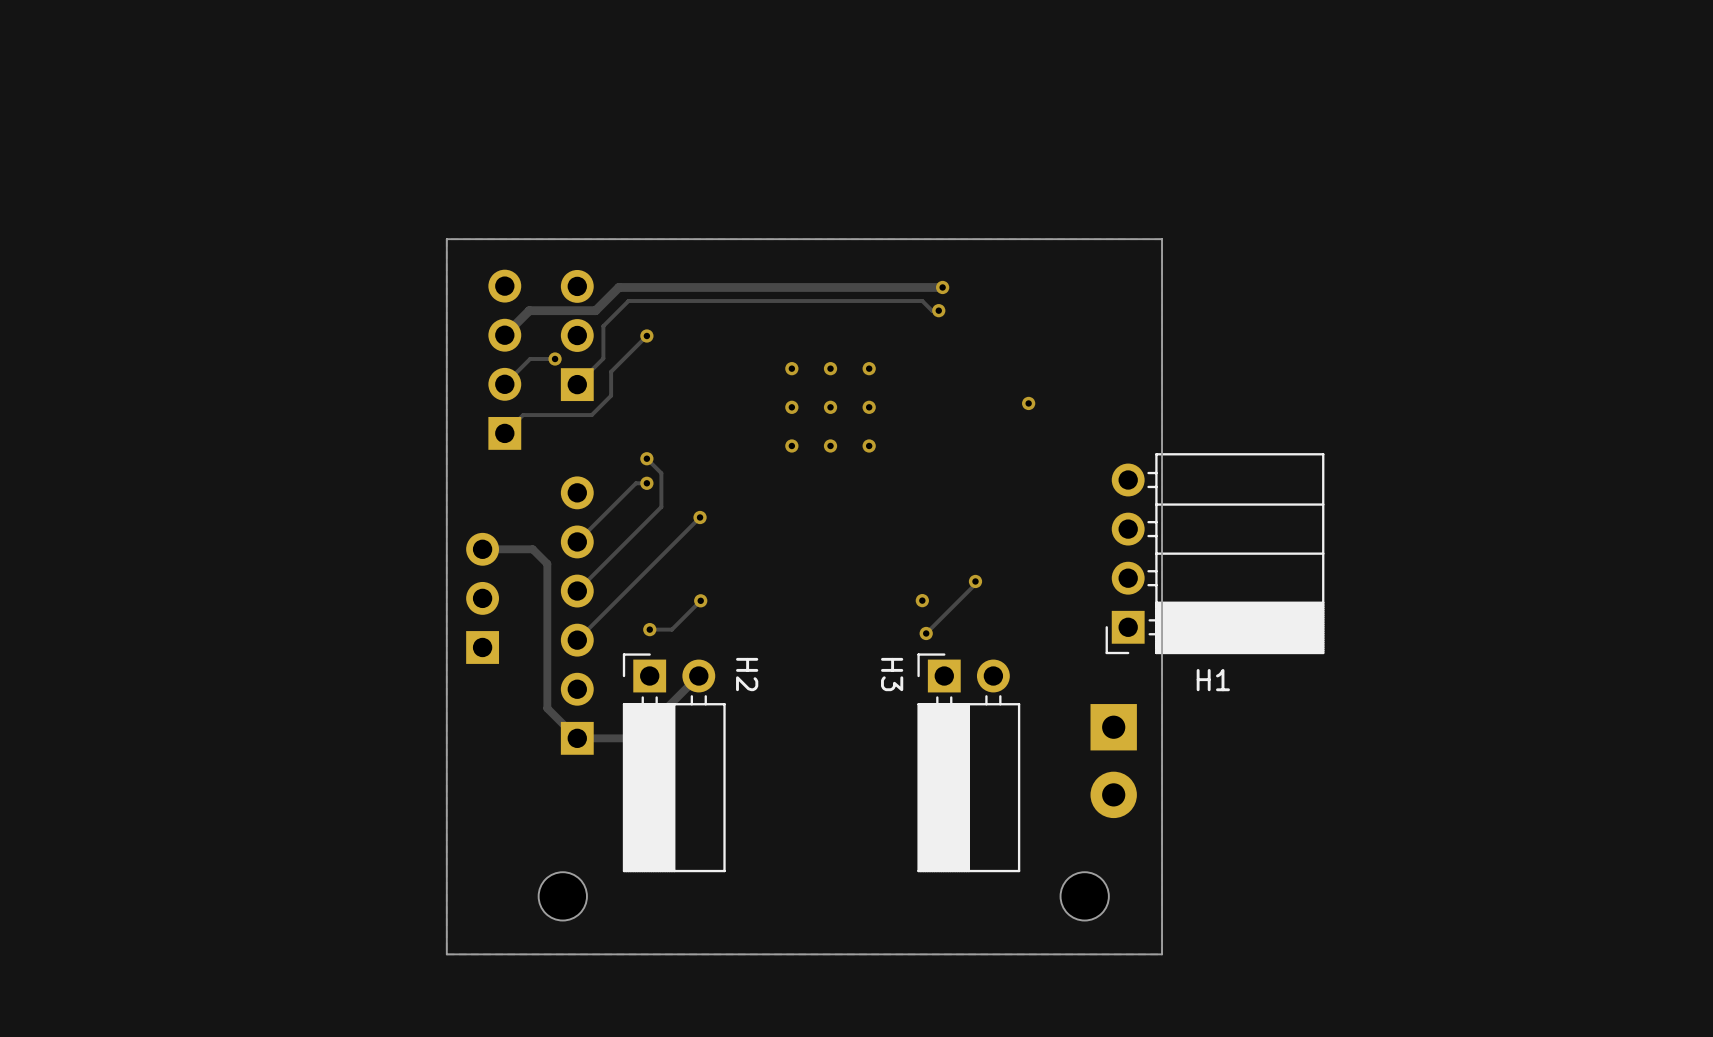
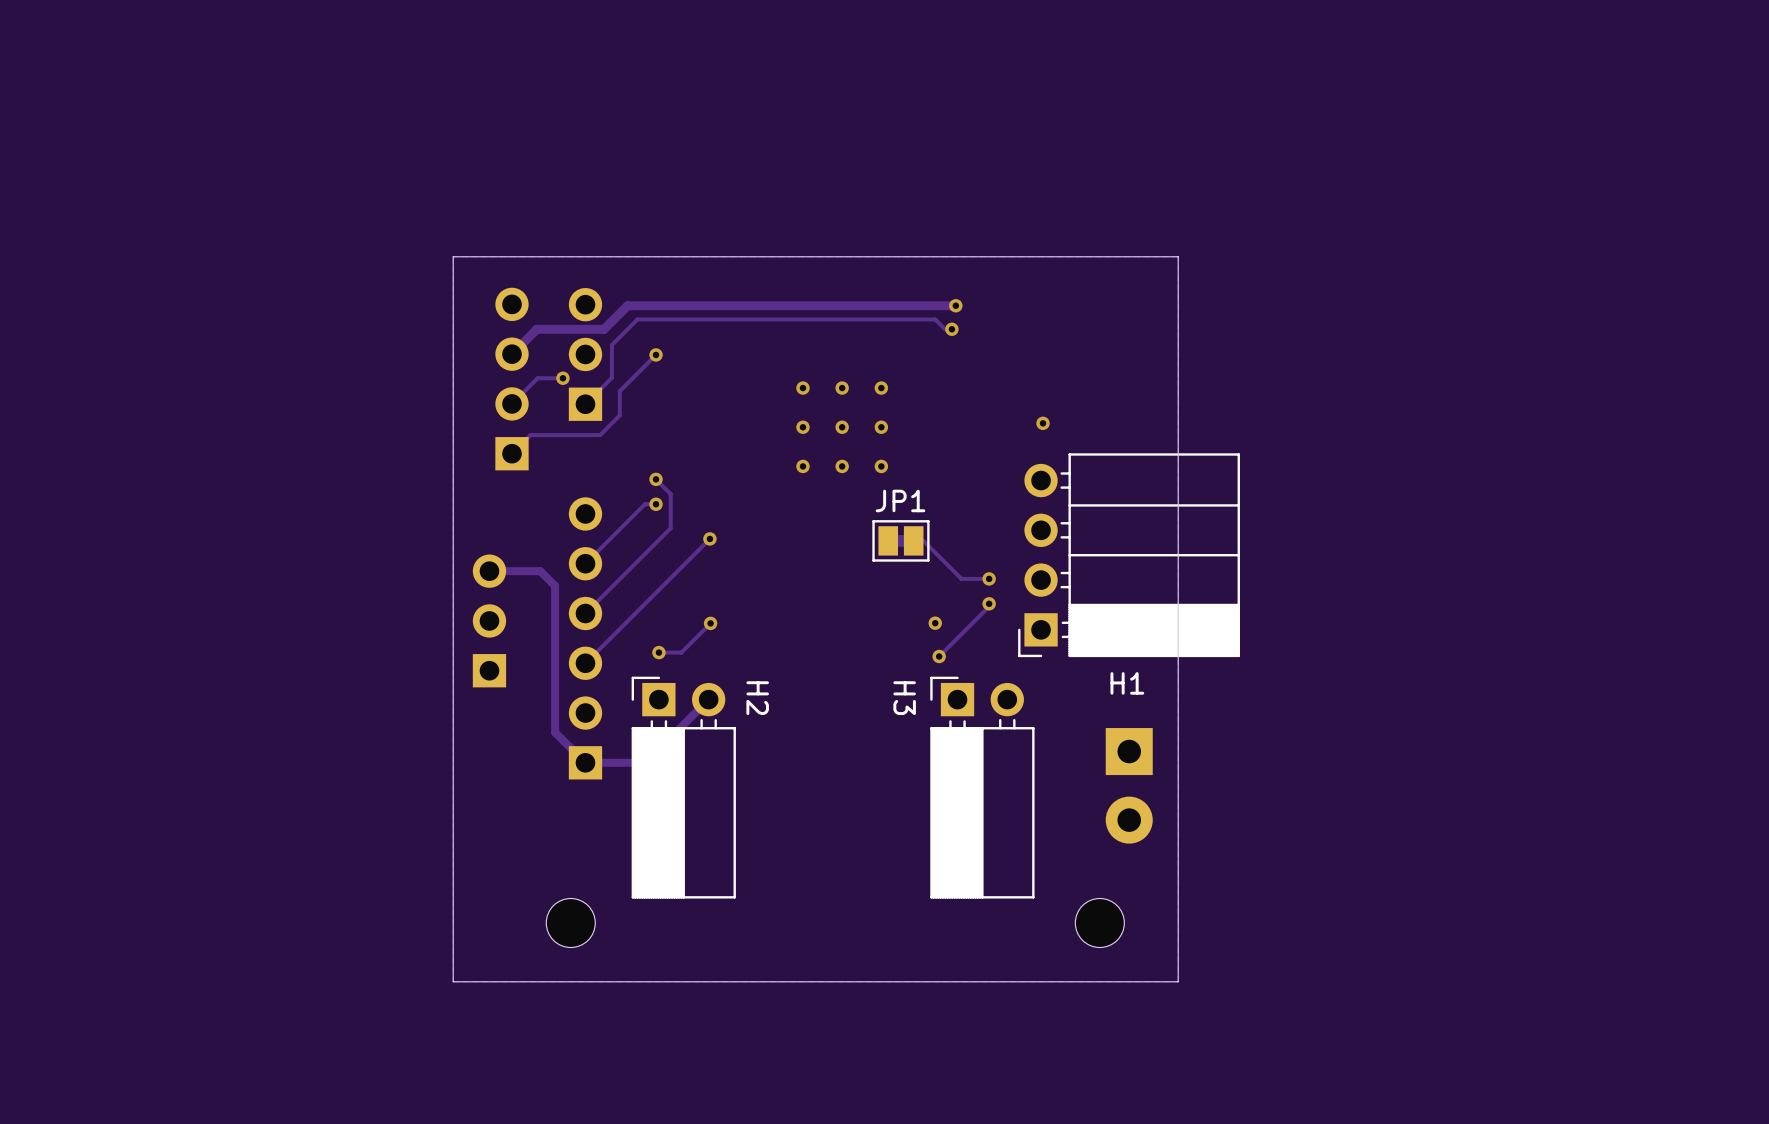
JP1: none -> (900, 540)
track: none -> (913, 540) (923, 540) (961, 578) (989, 578)
H1 position: (1214, 553) -> (1129, 555)
via: none -> (989, 578)

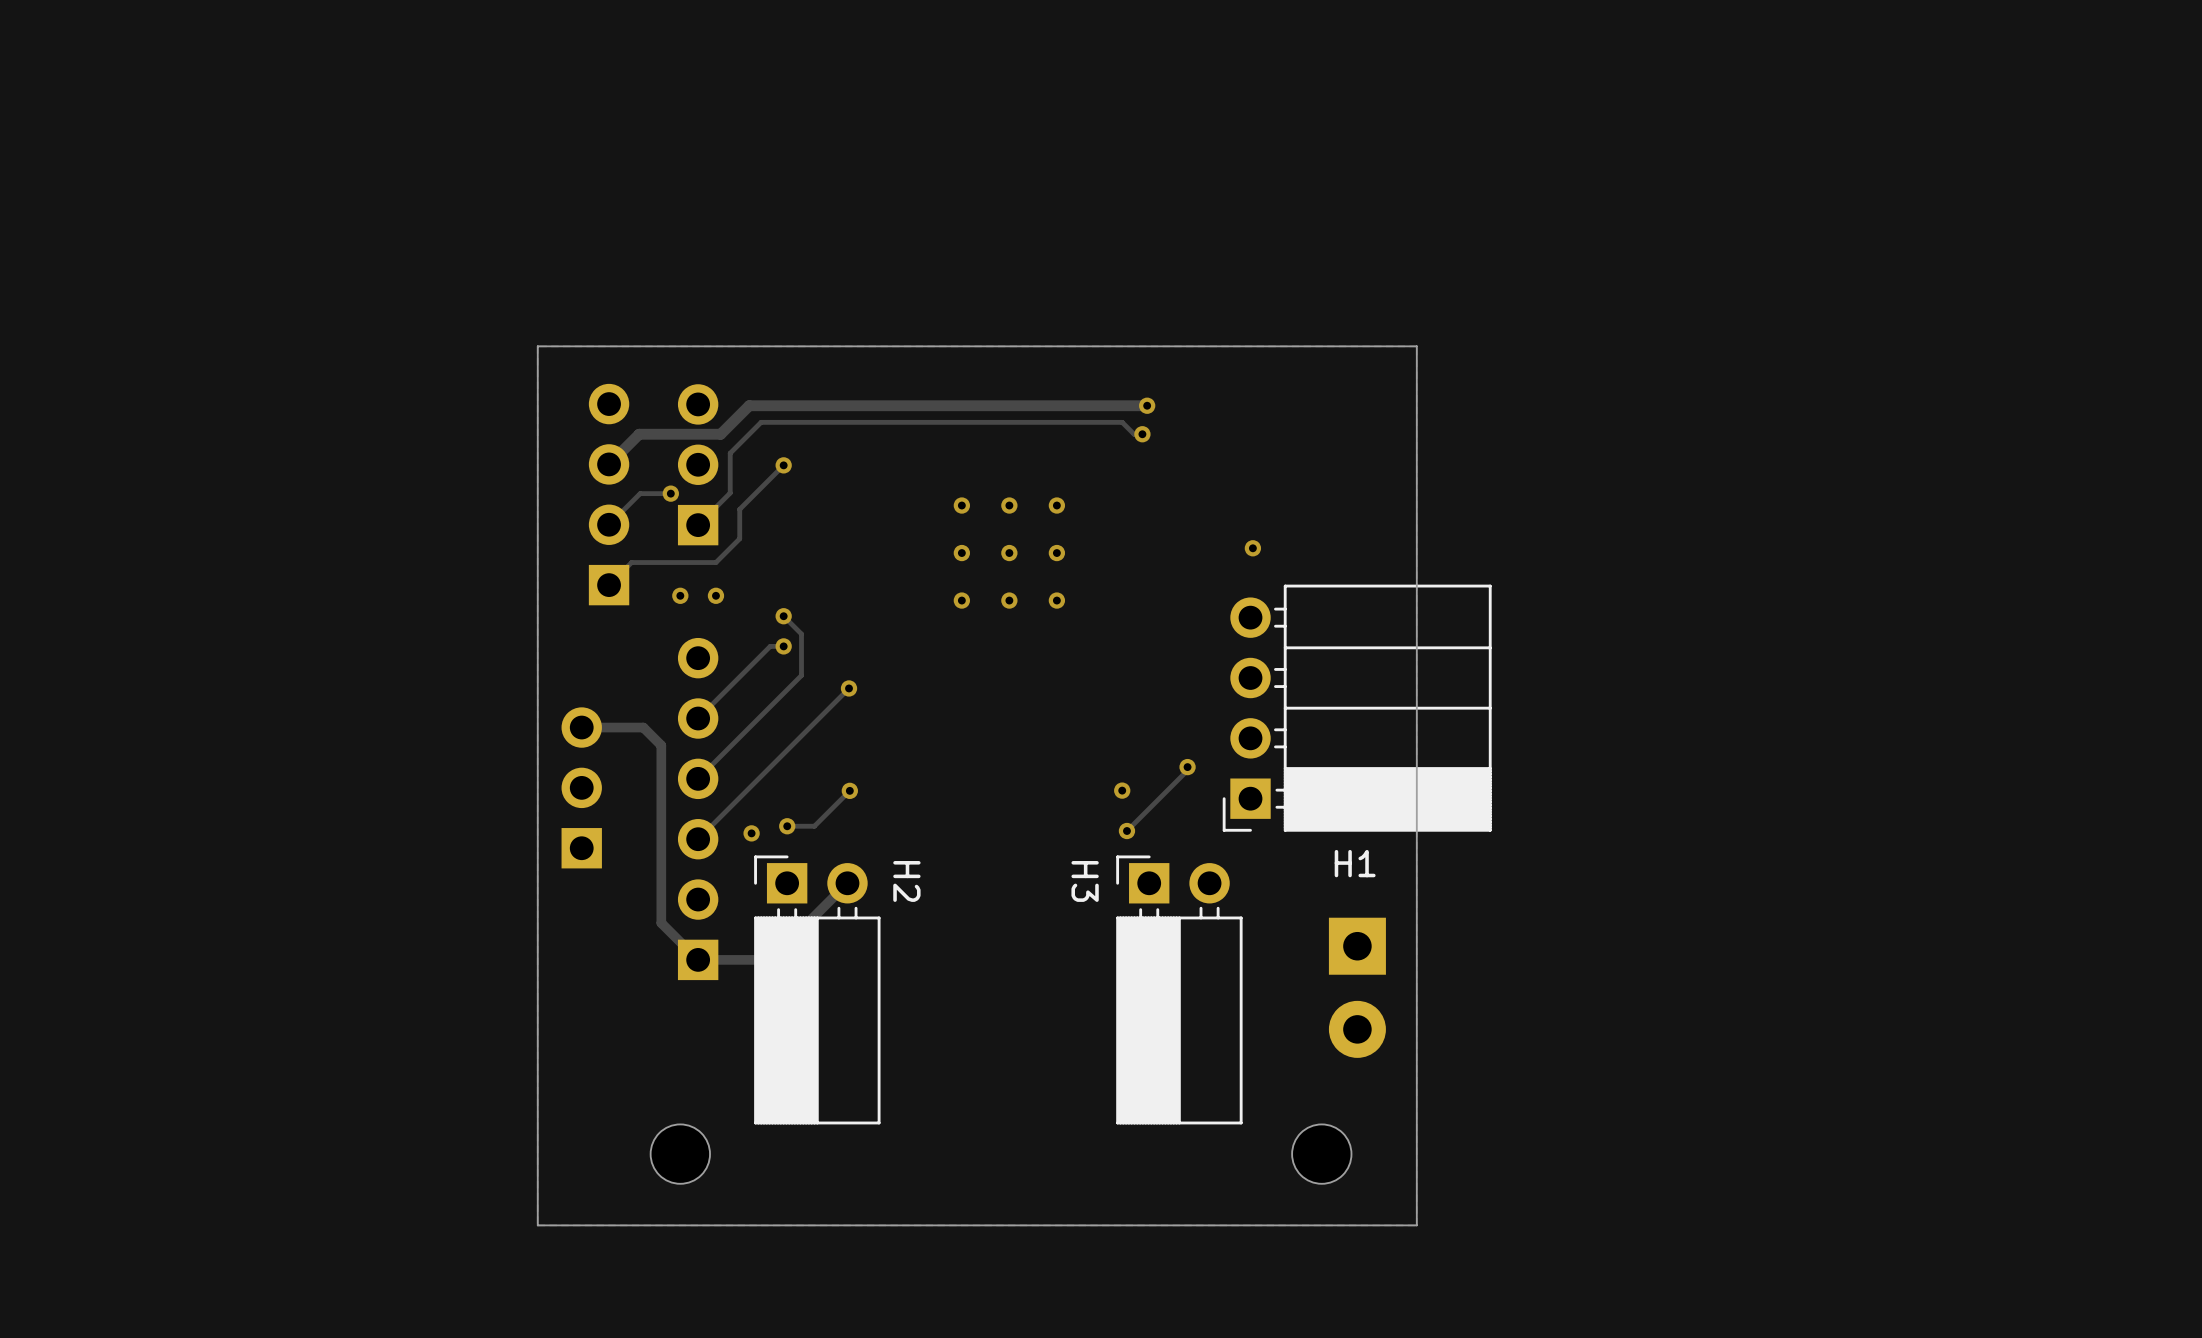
via: none -> (680, 595)
via: none -> (715, 595)
JP1: (900, 540) -> none
track: (913, 540) (923, 540) (961, 578) (989, 578) -> none
via: (989, 578) -> none
via: none -> (751, 833)

